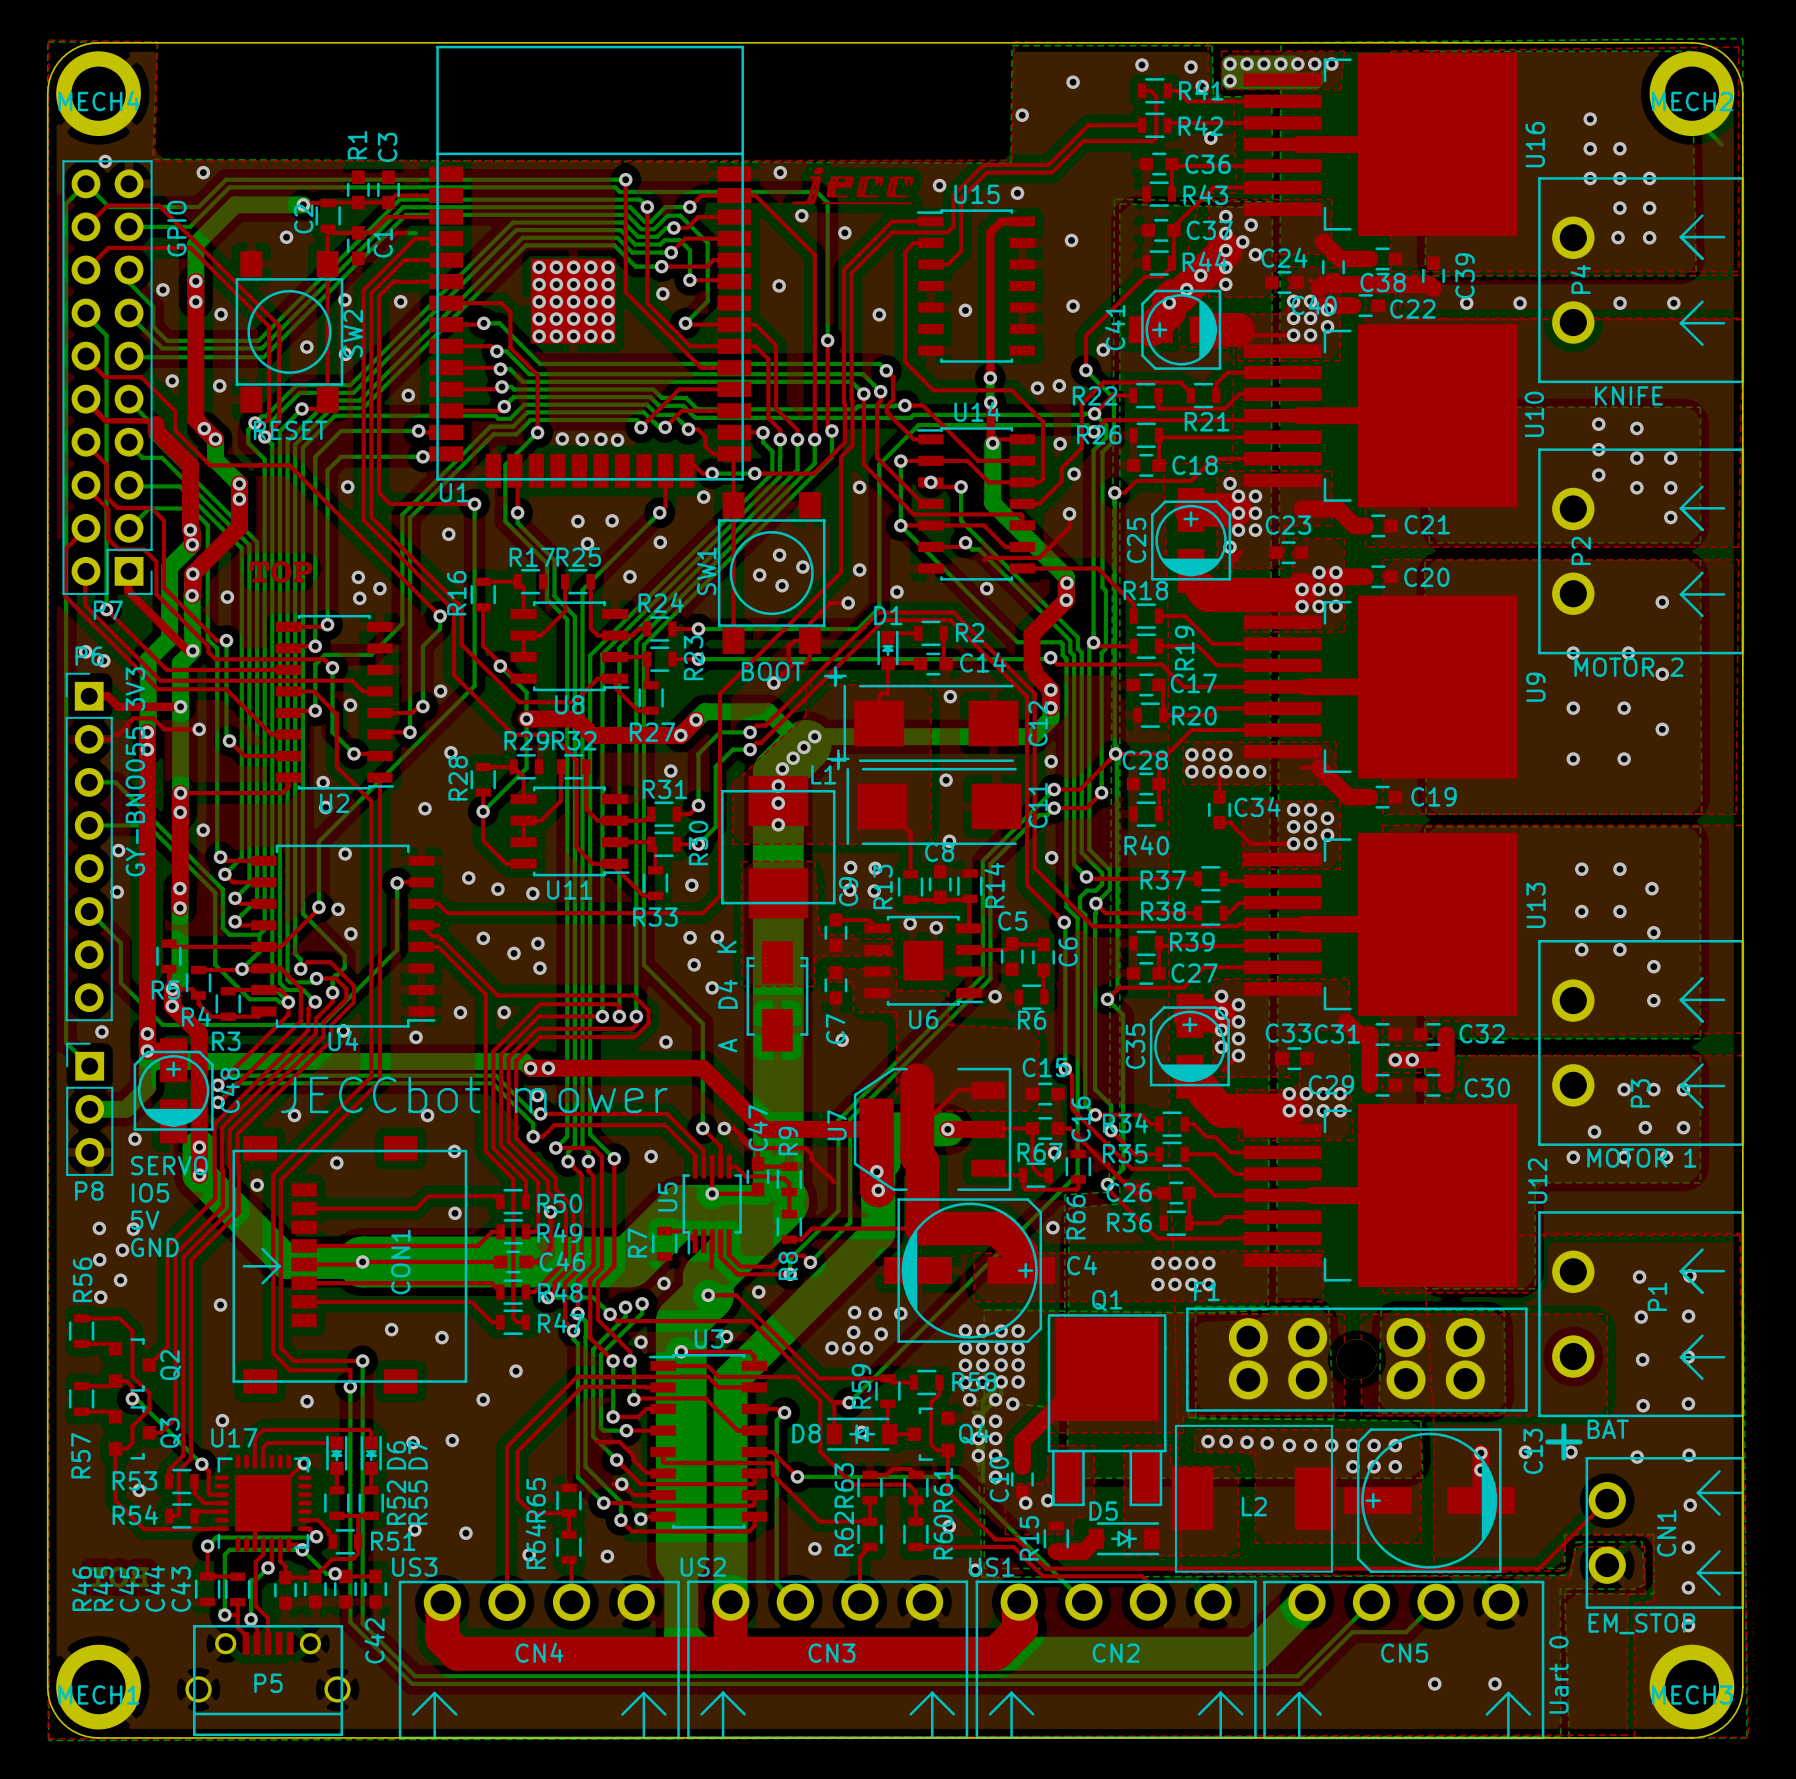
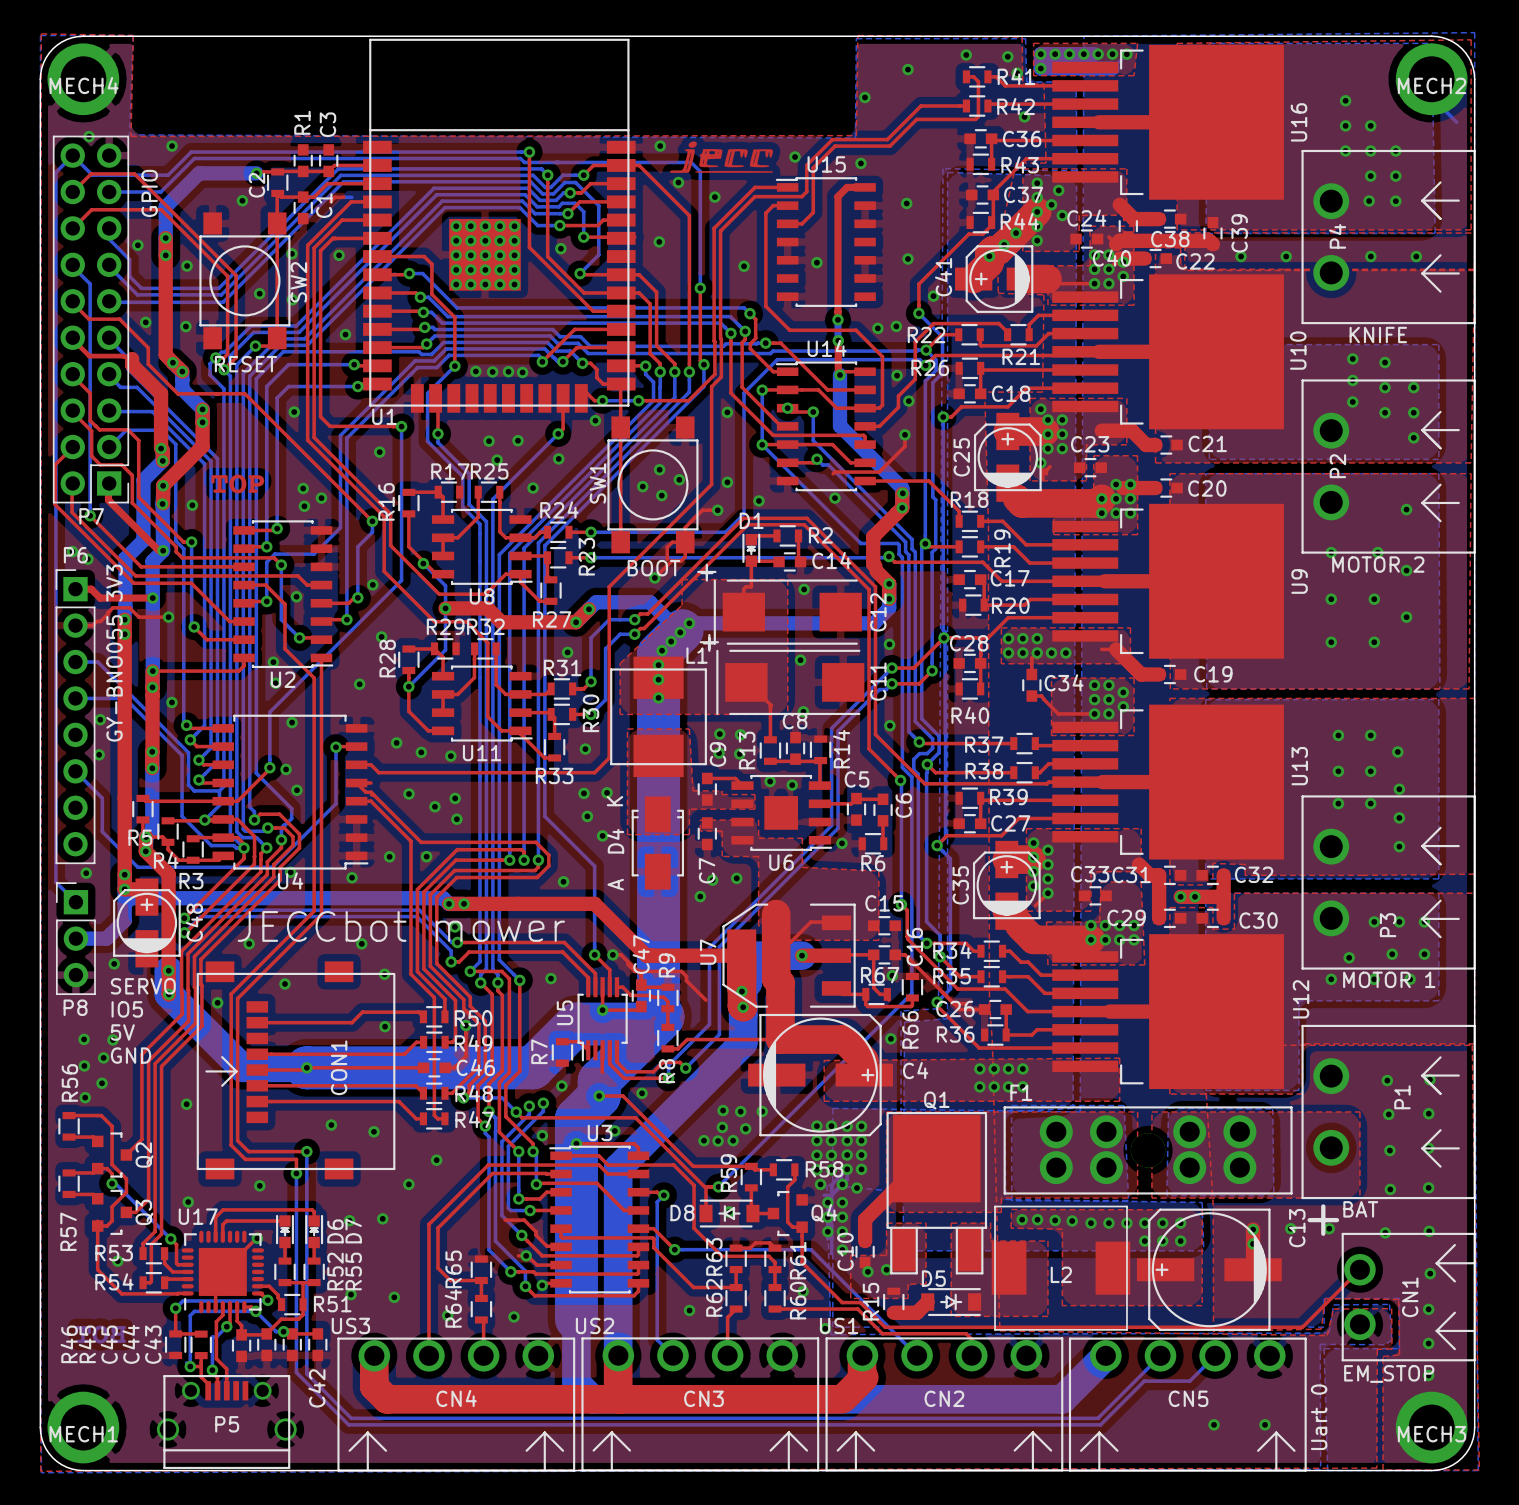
via: none -> (736, 878)
via: none -> (700, 896)

